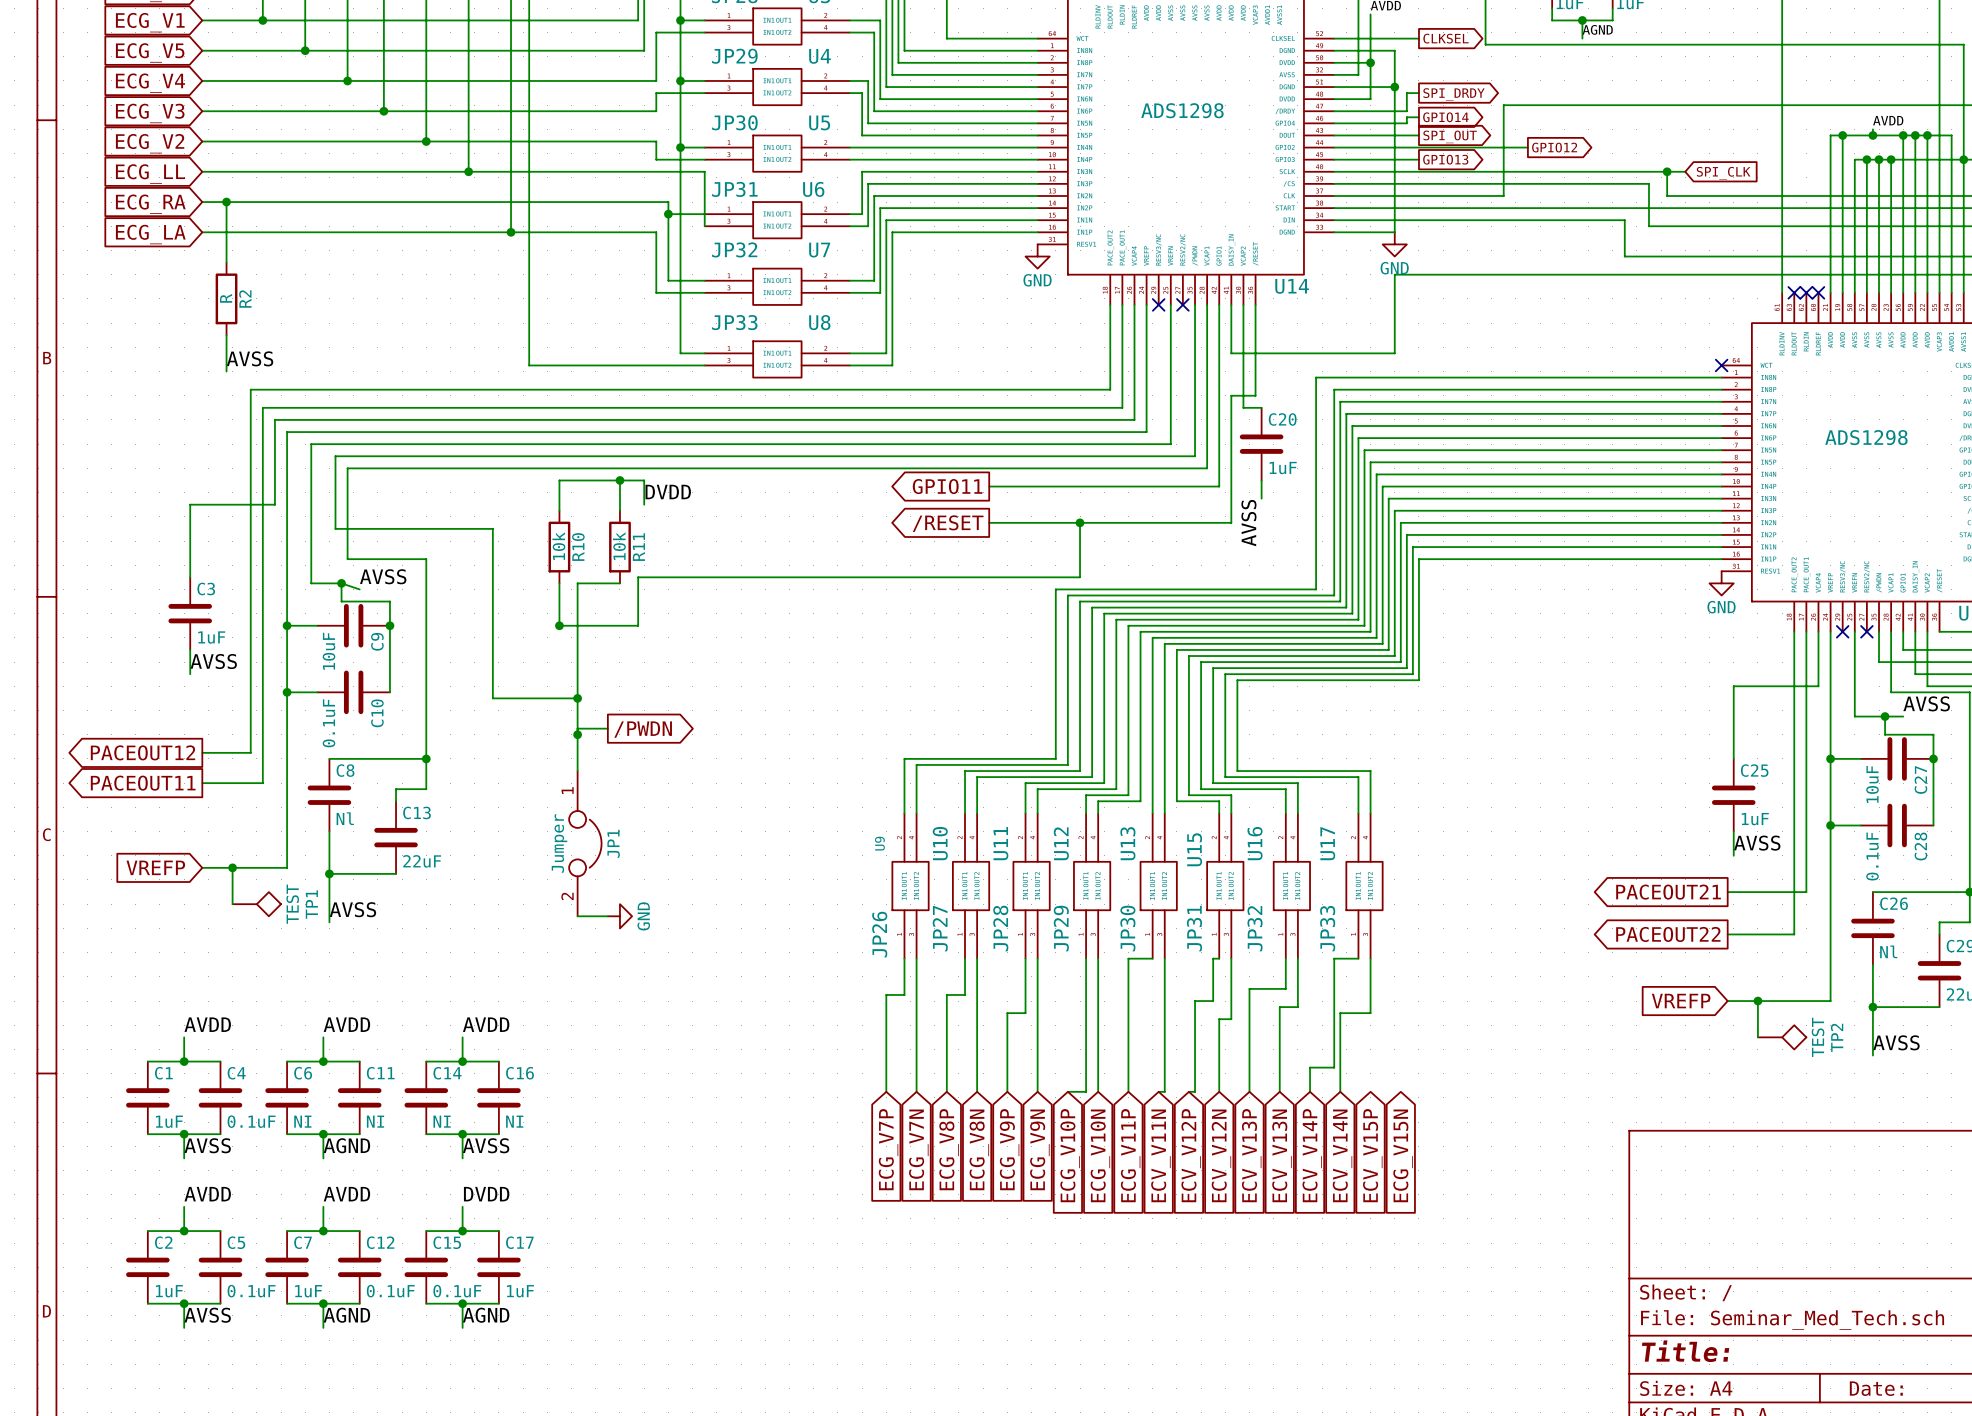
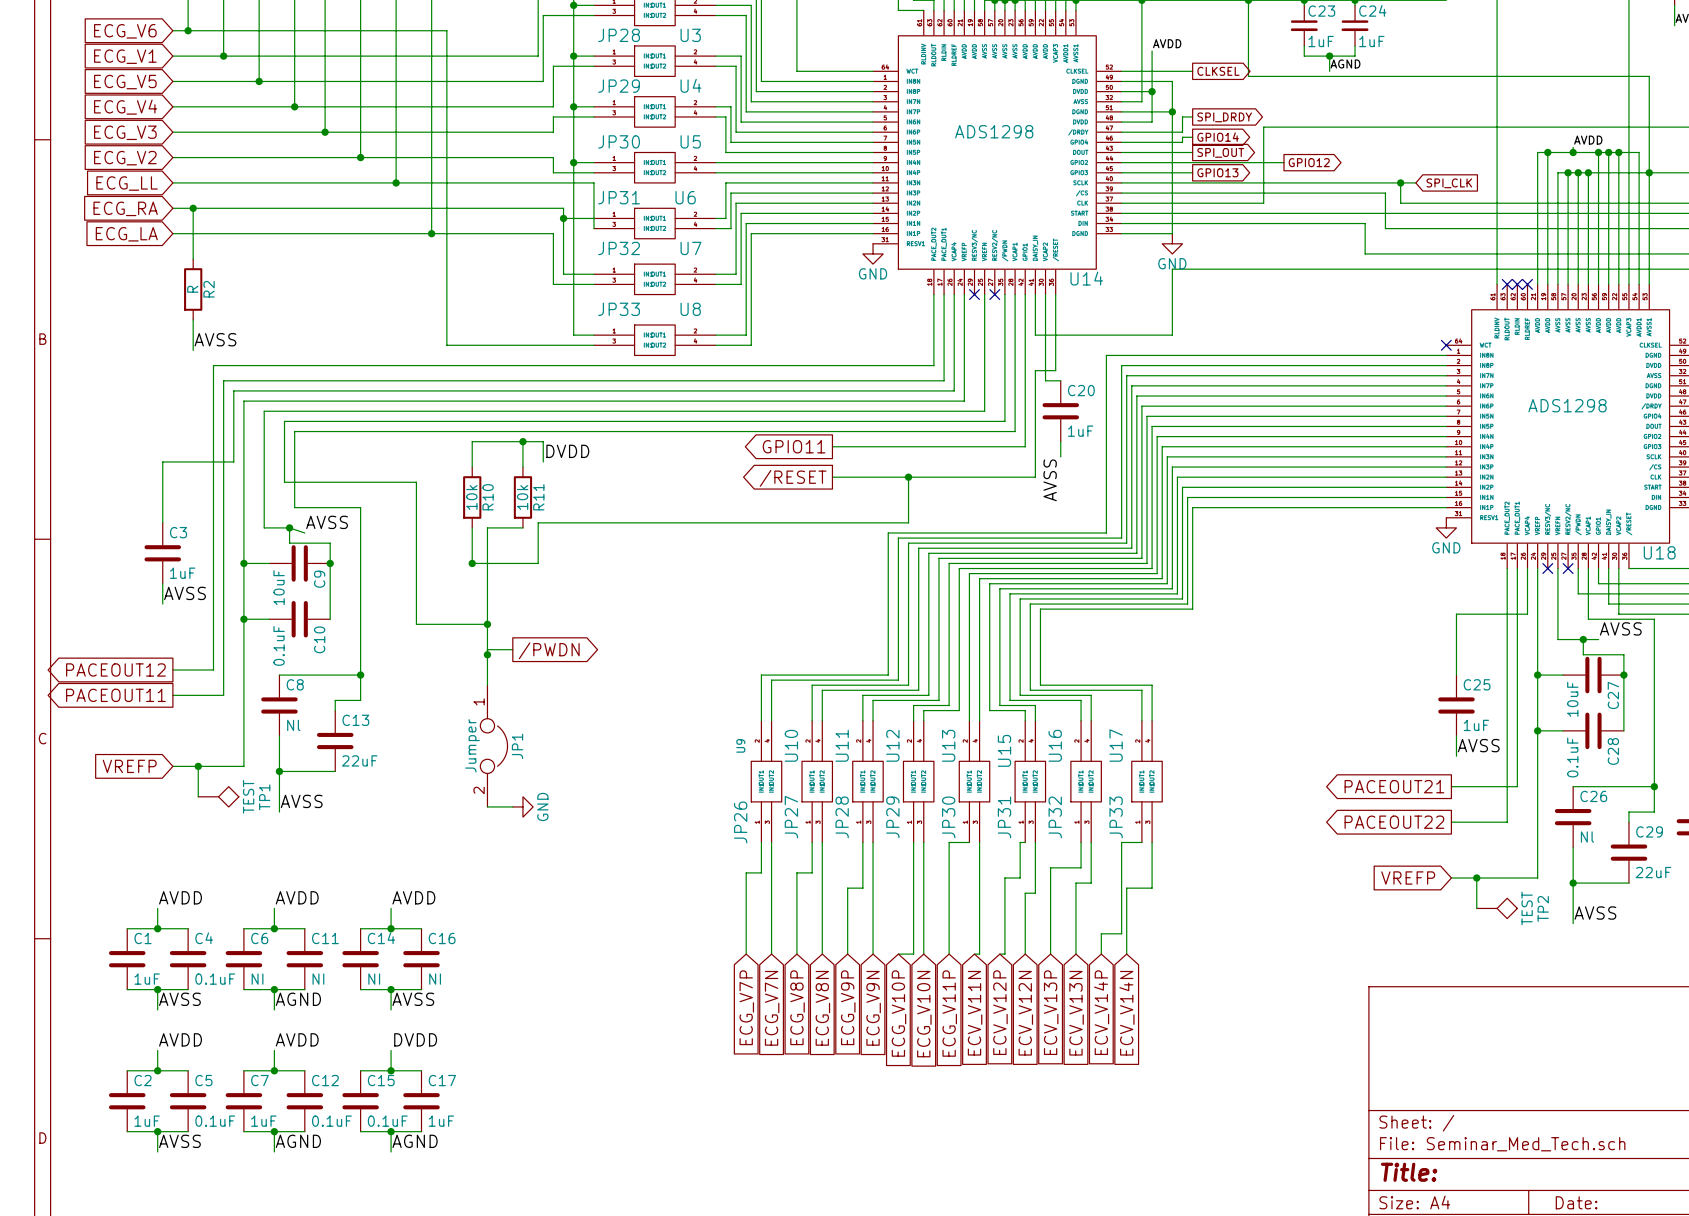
global label: ECV_V15P (1372, 1155) -> none
global label: ECG_V15N (1403, 1155) -> none

